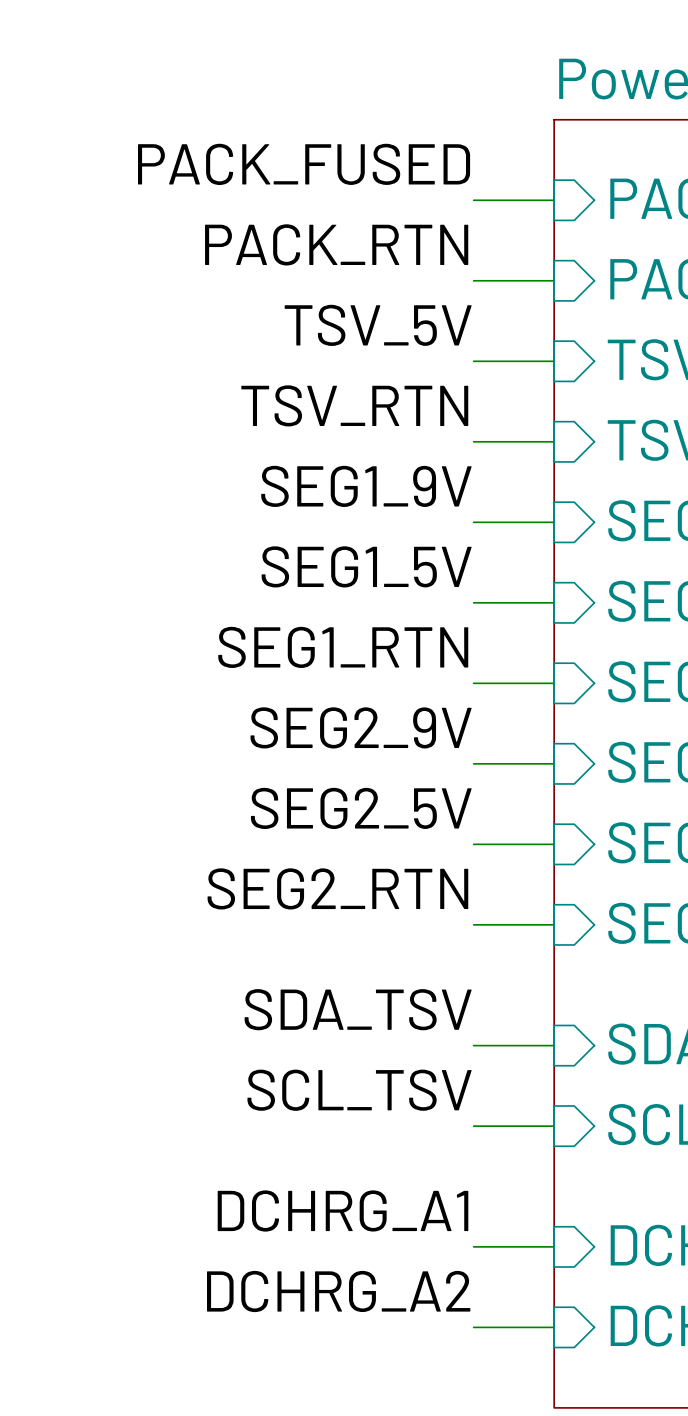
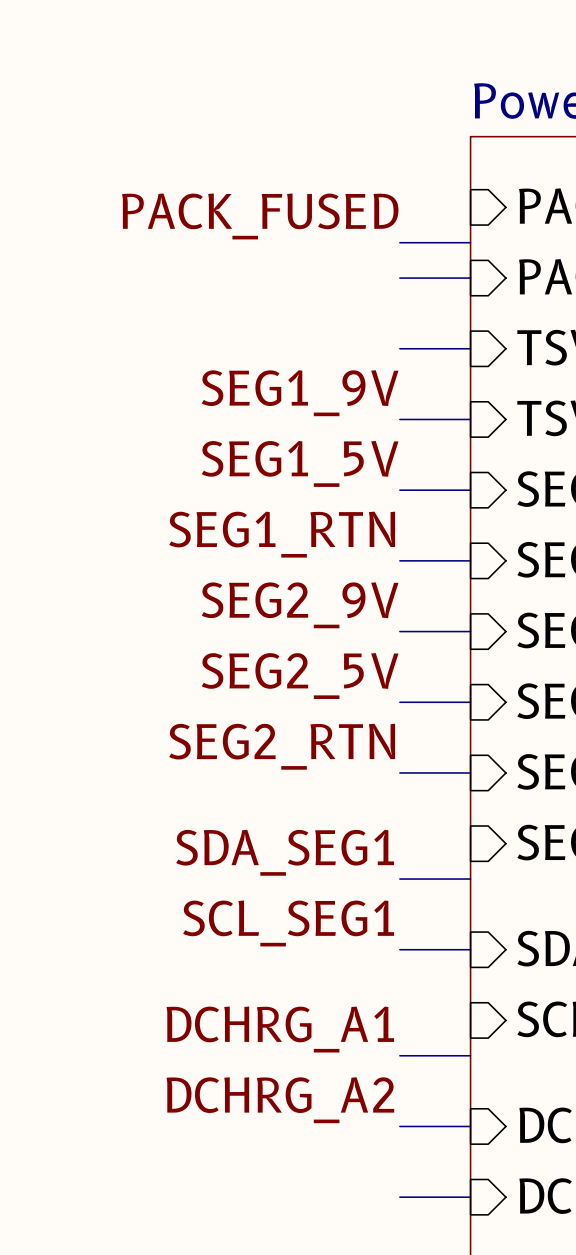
label position: PACK_FUSED (304, 164) -> PACK_FUSED (260, 216)
wire: (473, 200) (554, 200) -> (399, 242) (470, 242)
label: PACK_RTN (336, 244) -> none
label: TSV_5V (378, 325) -> none
label: TSV_RTN (354, 405) -> SEG1_9V (300, 393)
label: SEG1_9V (366, 486) -> SEG1_5V (300, 463)
label: SEG1_5V (366, 566) -> SEG1_RTN (282, 534)
label: SEG1_RTN (343, 647) -> SEG2_9V (300, 605)
label: SEG2_9V (361, 727) -> SEG2_5V (300, 676)
label: SEG2_5V (361, 808) -> SEG2_RTN (282, 746)
label: SEG2_RTN (337, 888) -> none
wire: (473, 924) (554, 924) -> (399, 879) (470, 879)
label: none -> SDA_SEG1 (285, 852)
label: SDA_TSV (358, 1009) -> SCL_SEG1 (288, 923)
label: SCL_TSV (359, 1090) -> none
wire: (473, 1126) (554, 1126) -> (399, 1055) (470, 1055)
label: none -> DCHRG_A1 (280, 1029)
label: DCHRG_A1 (343, 1210) -> DCHRG_A2 (280, 1100)
label: DCHRG_A2 (338, 1291) -> none

